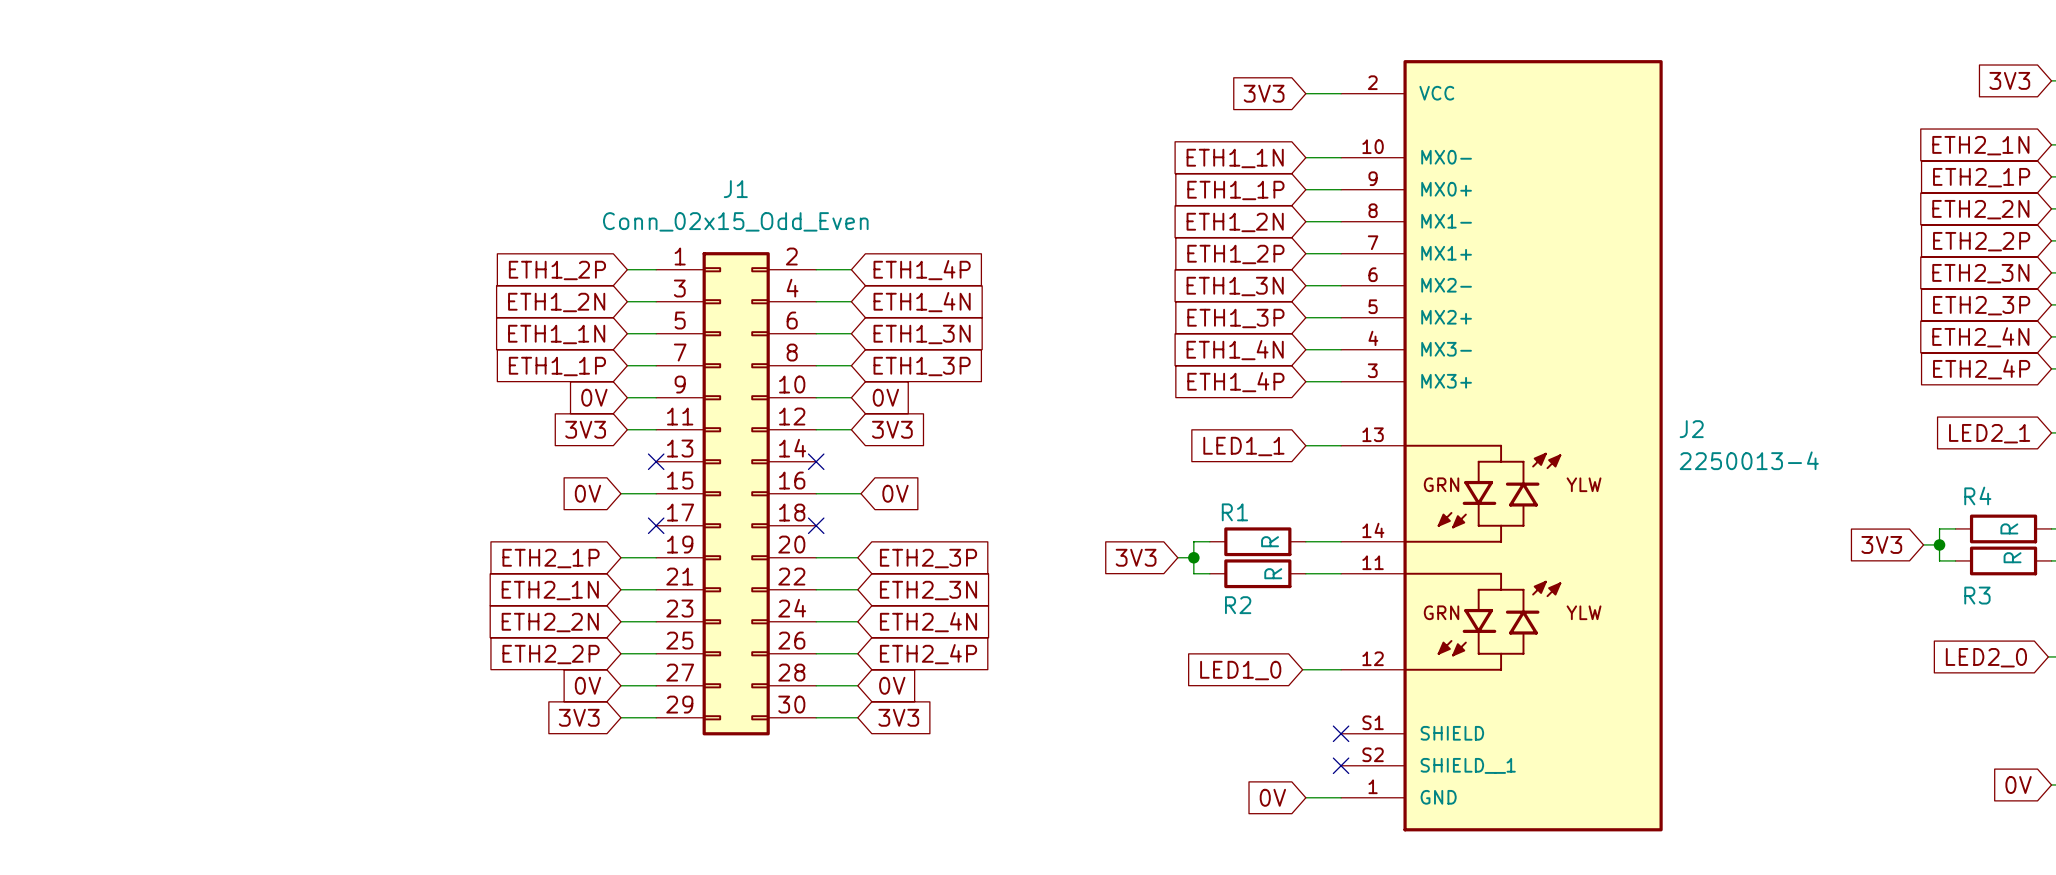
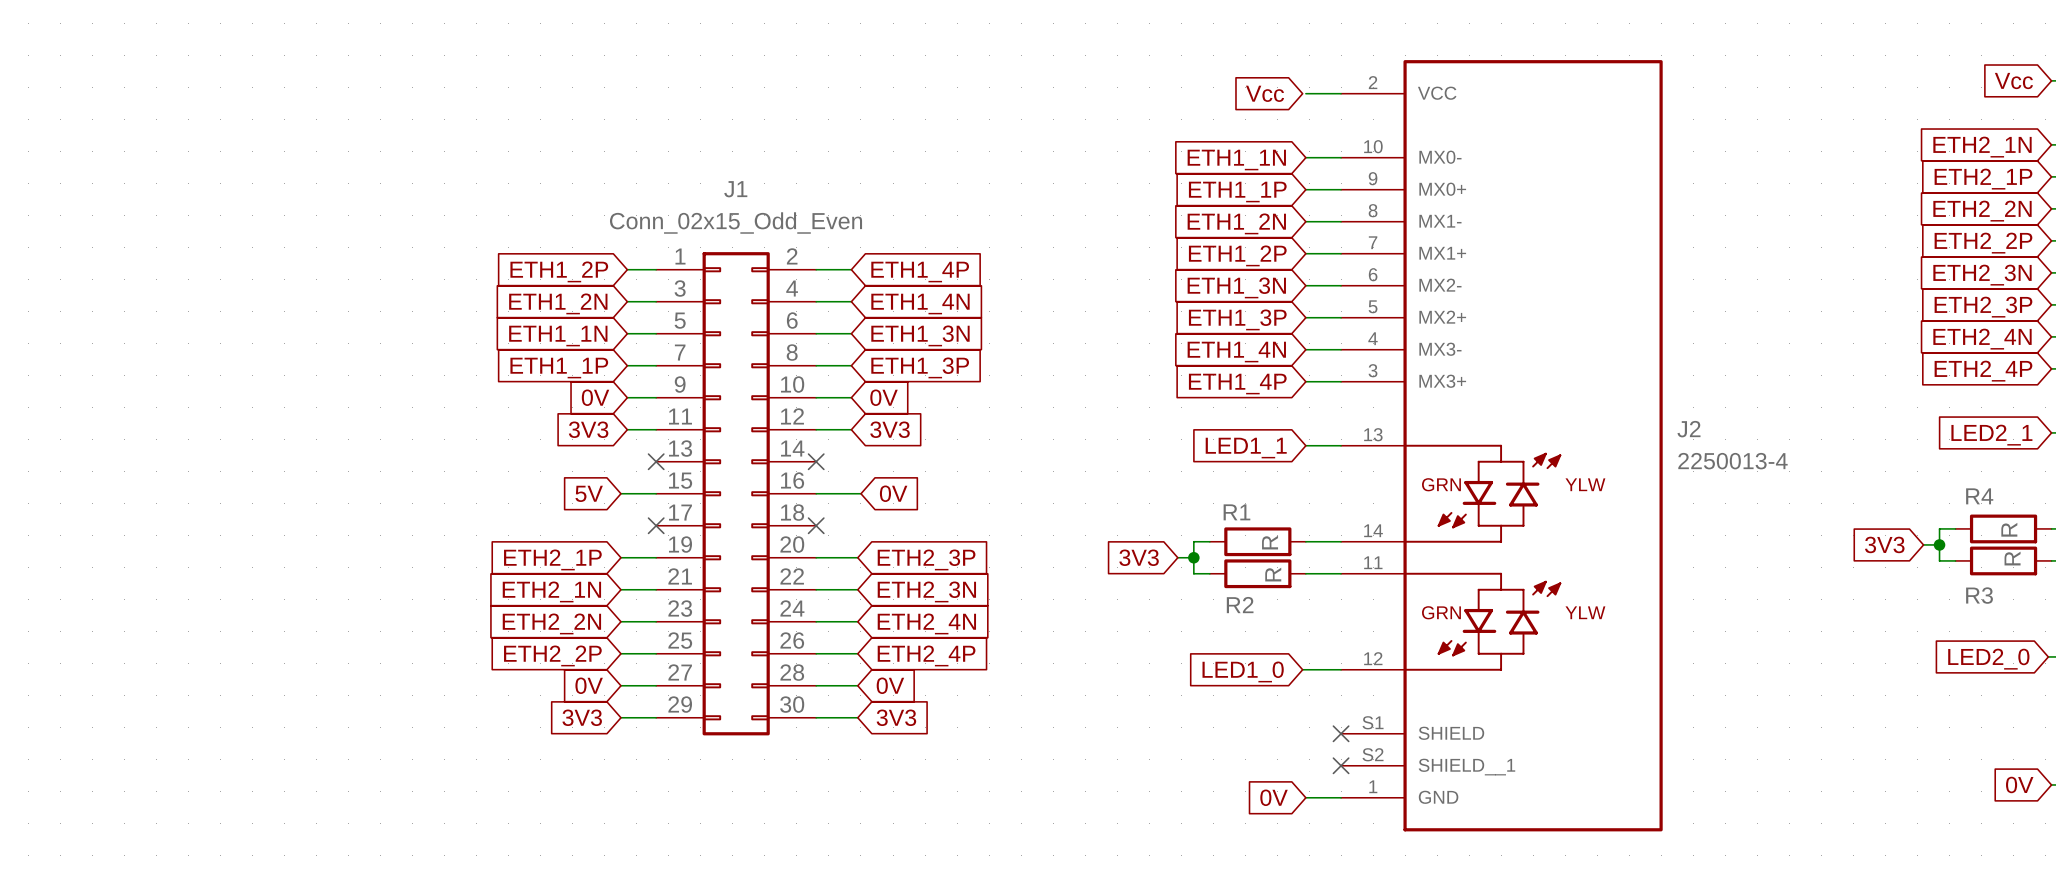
global label: 3V3 (2009, 80) -> Vcc (2013, 81)
global label: 3V3 (1264, 93) -> Vcc (1265, 93)
global label: 0V (587, 493) -> 5V (589, 493)

